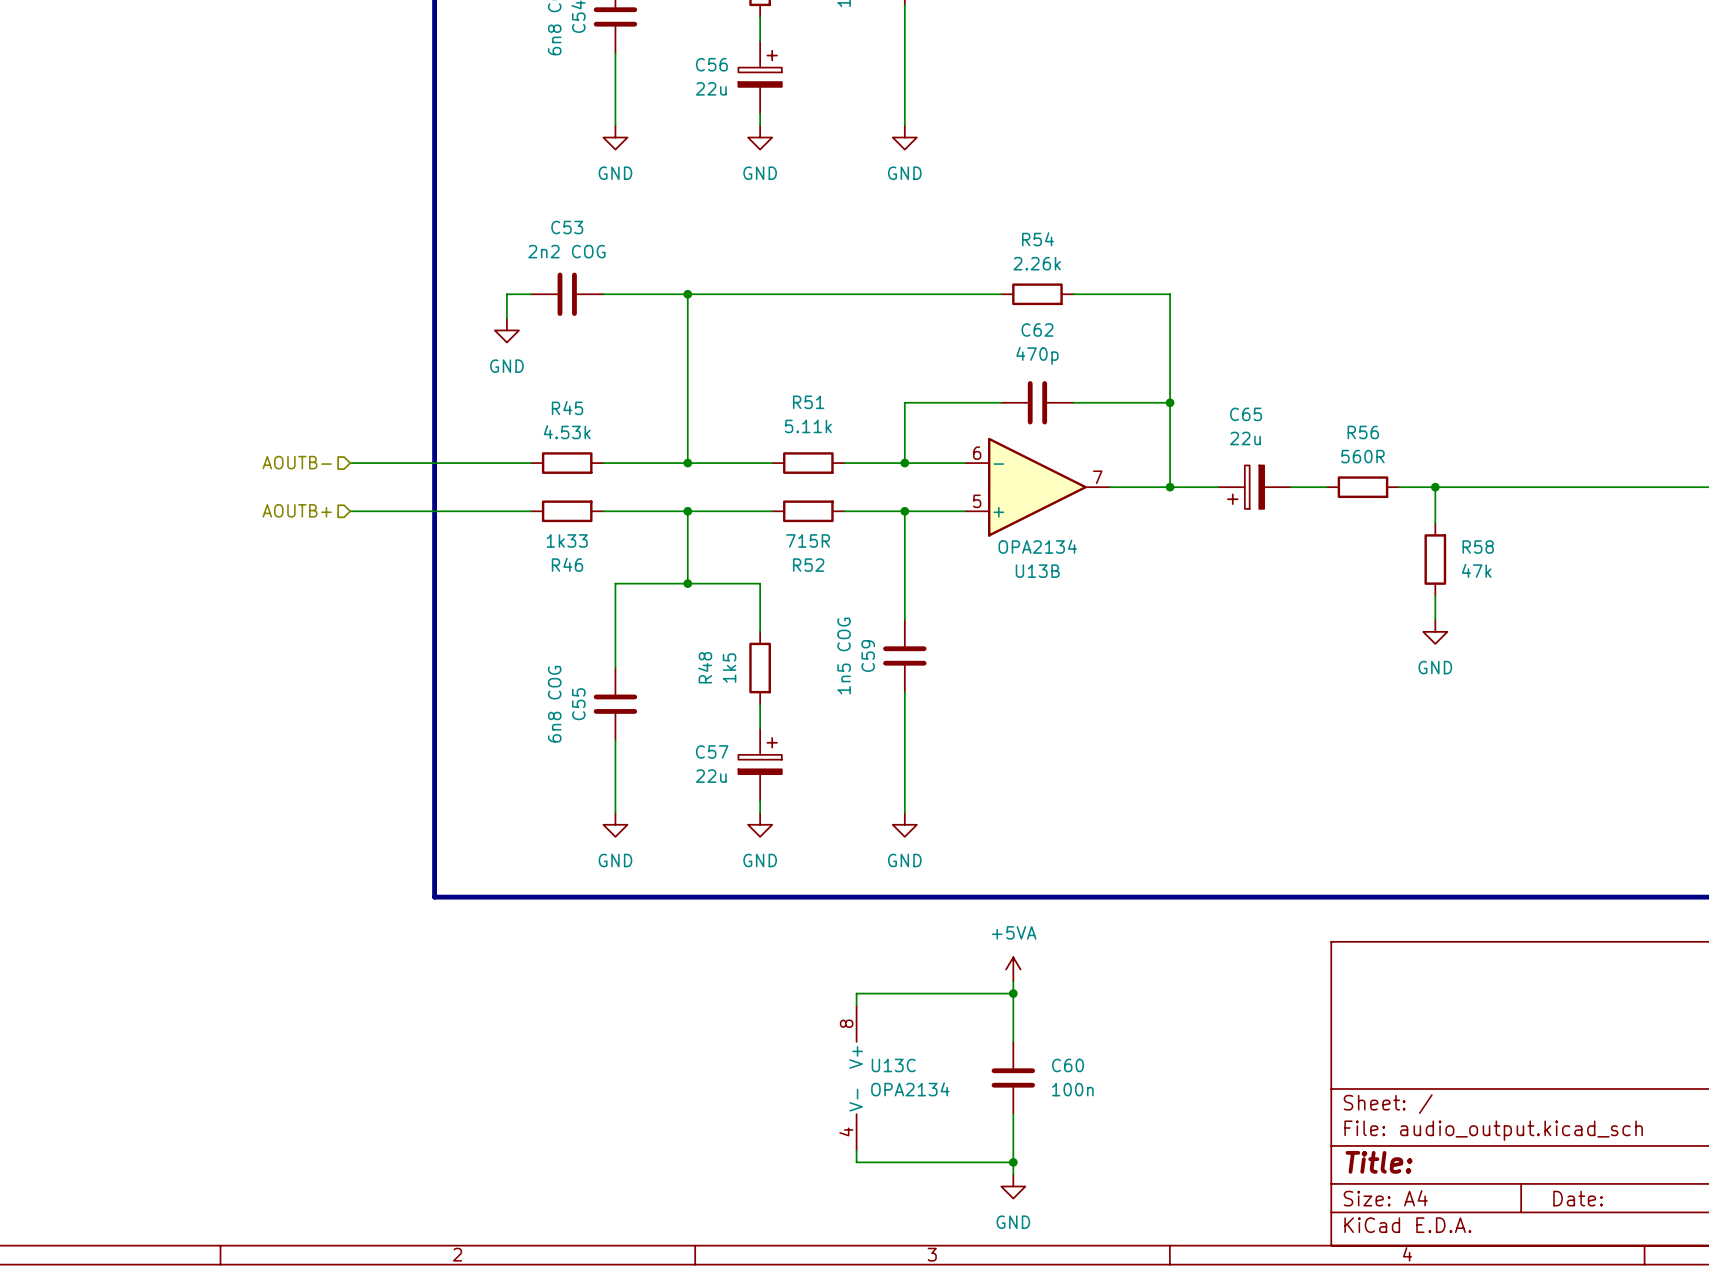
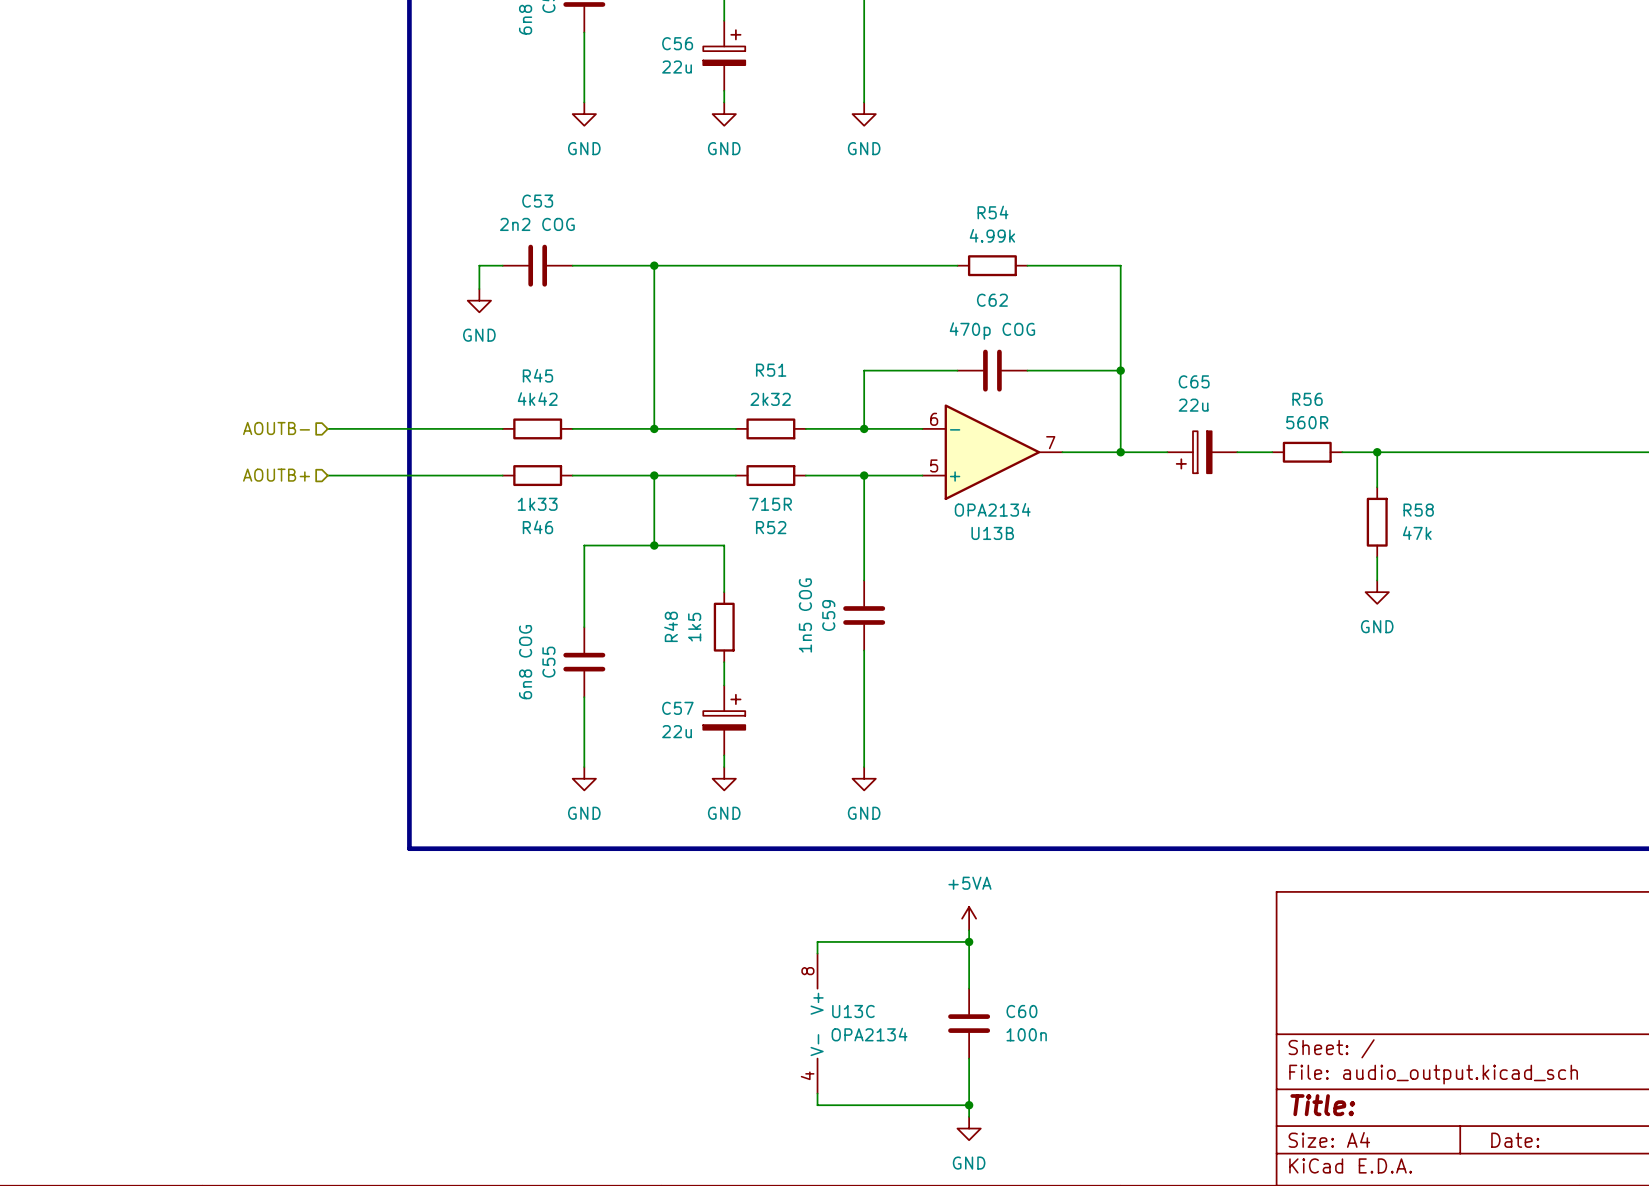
R54 value: 2.26k (1037, 263) -> 4.99k (992, 235)
C62 value: 470p (1037, 355) -> 470p COG (992, 331)
R51 value: 5.11k (808, 426) -> 2k32 (770, 399)
R45 value: 4.53k (567, 432) -> 4k42 (537, 399)

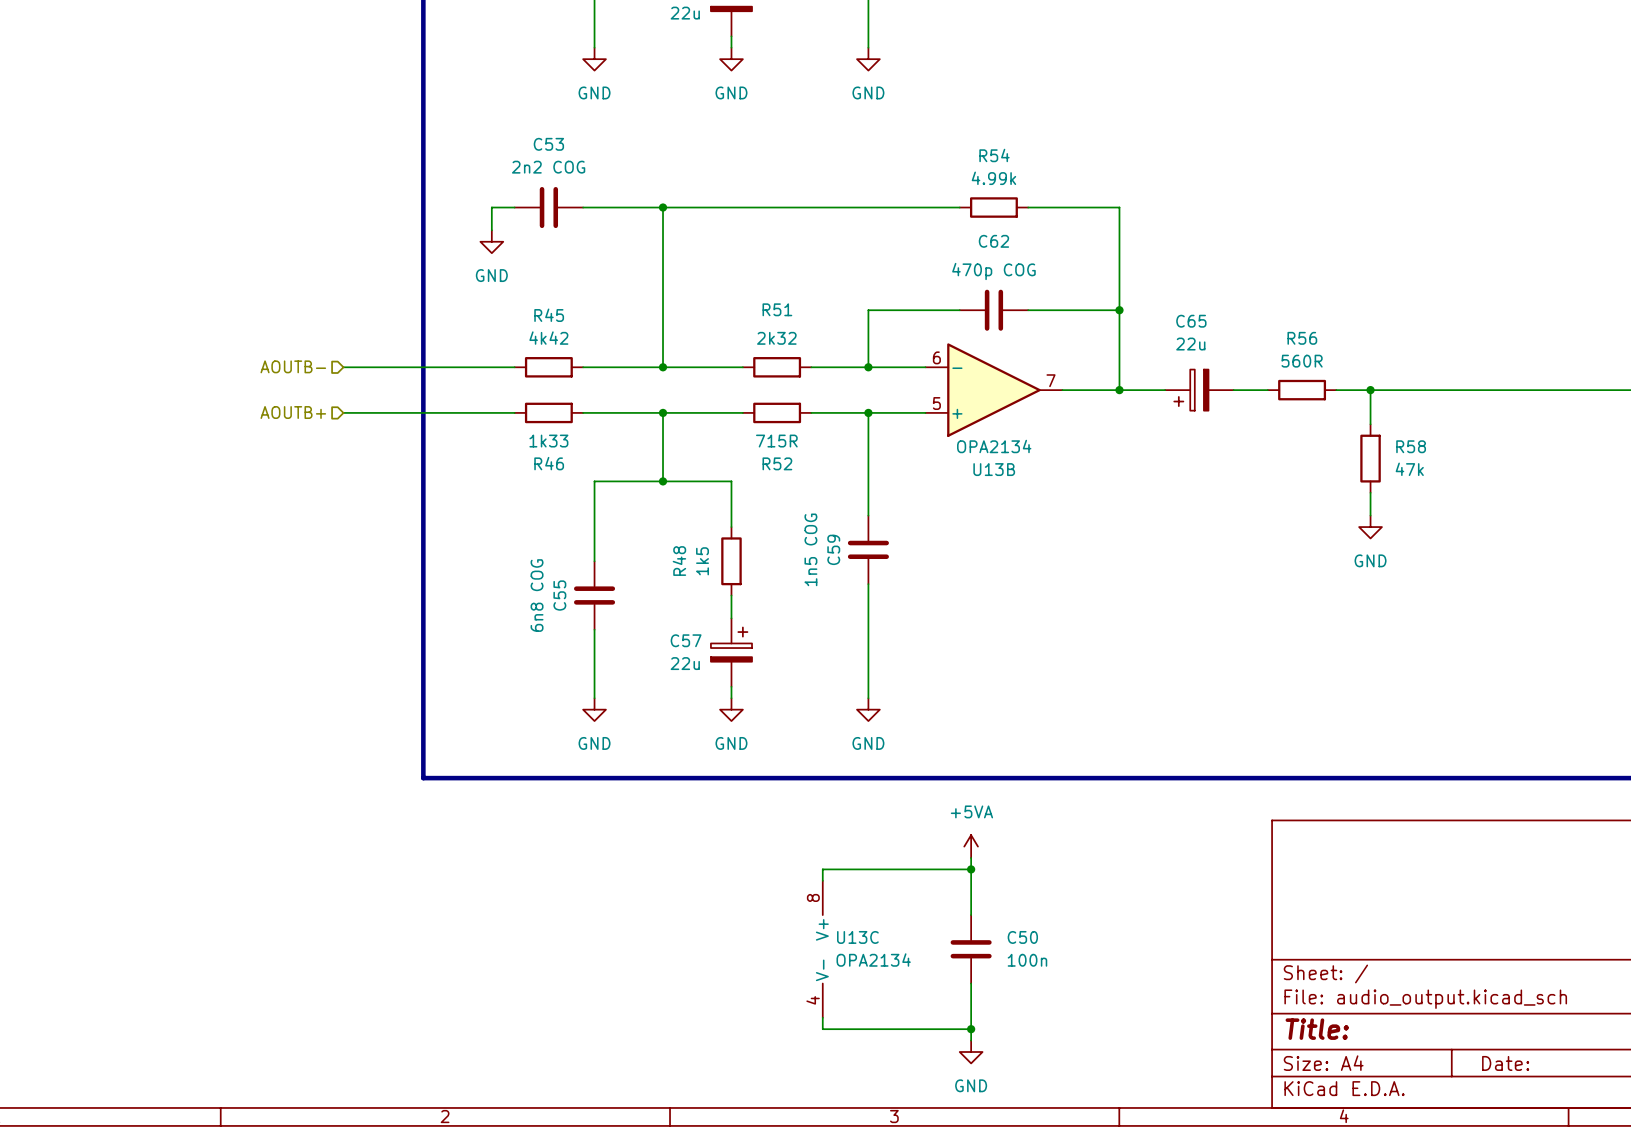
C60 name: C60 (1021, 1011) -> C50 (1022, 937)

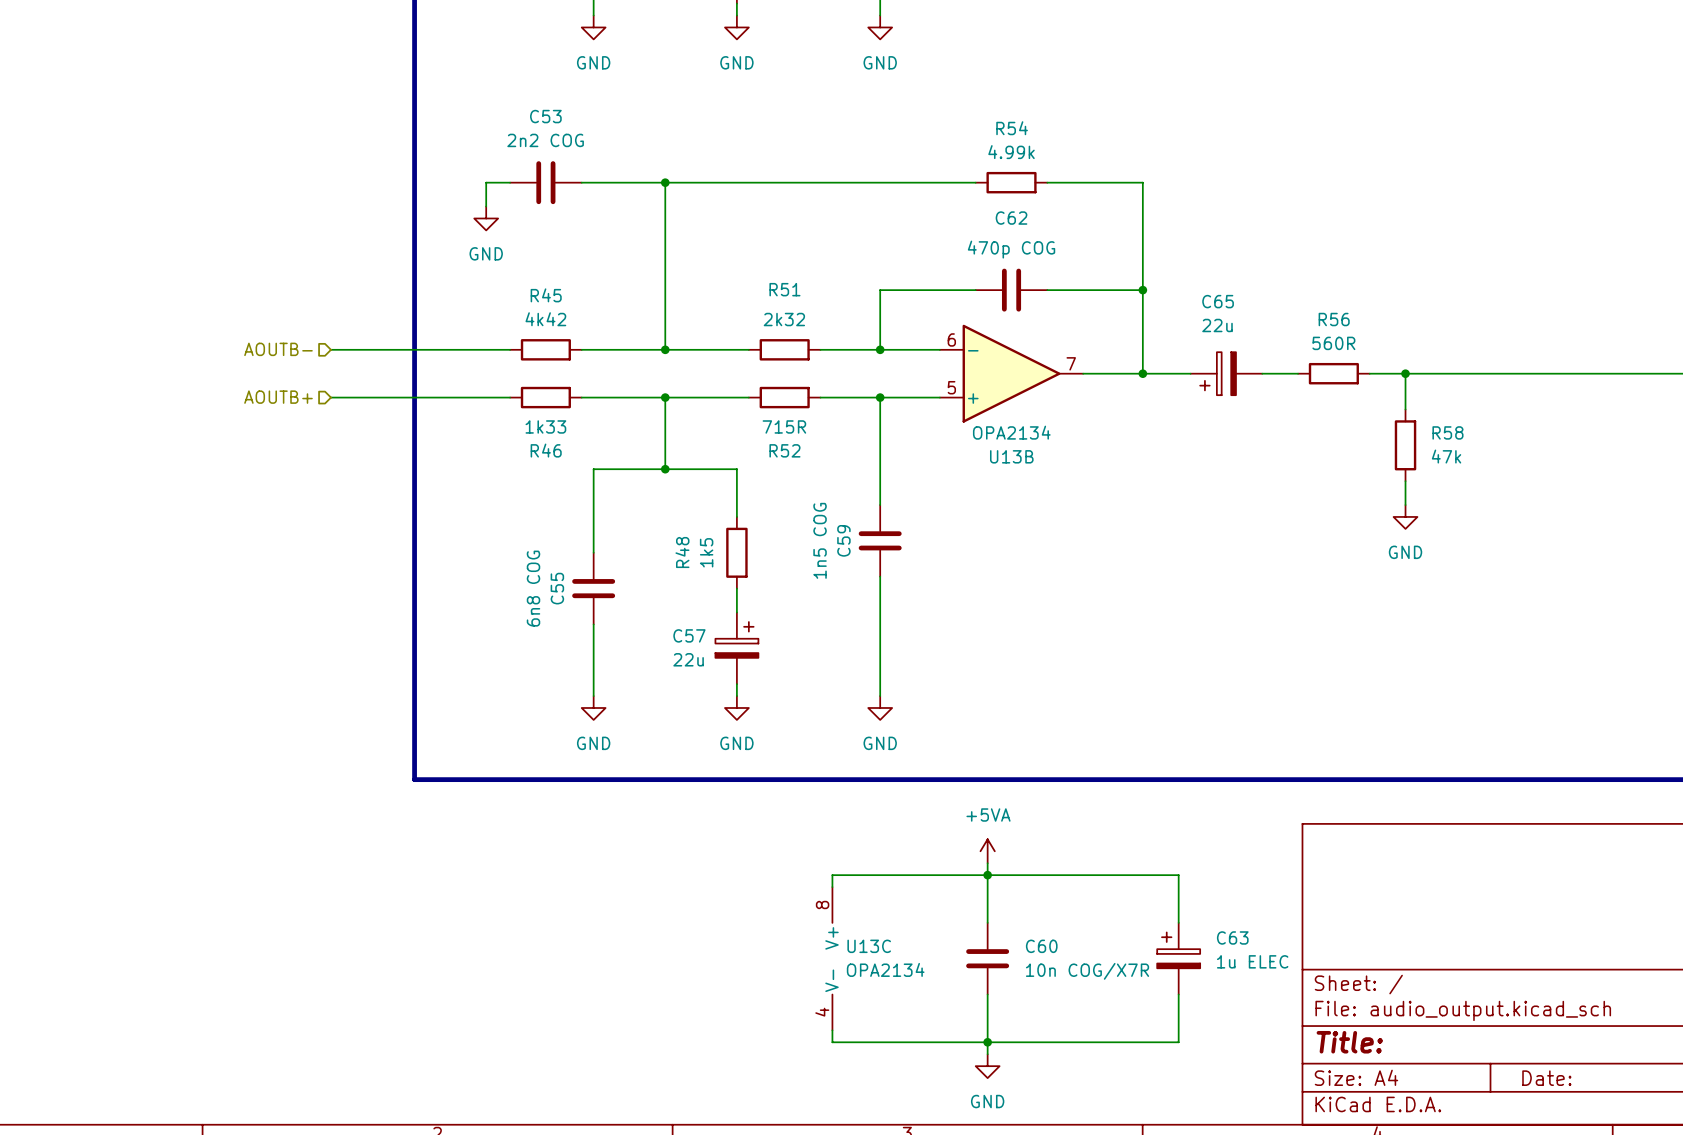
wire: none -> (987, 875) (1178, 875) (1178, 922)
C50 name: C50 (1022, 937) -> C60 (1041, 946)
C63: none -> 1u ELEC (1178, 958)
C50 value: 100n (1027, 960) -> 10n COG/X7R (1087, 971)
wire: none -> (1178, 994) (1178, 1042) (987, 1042)

